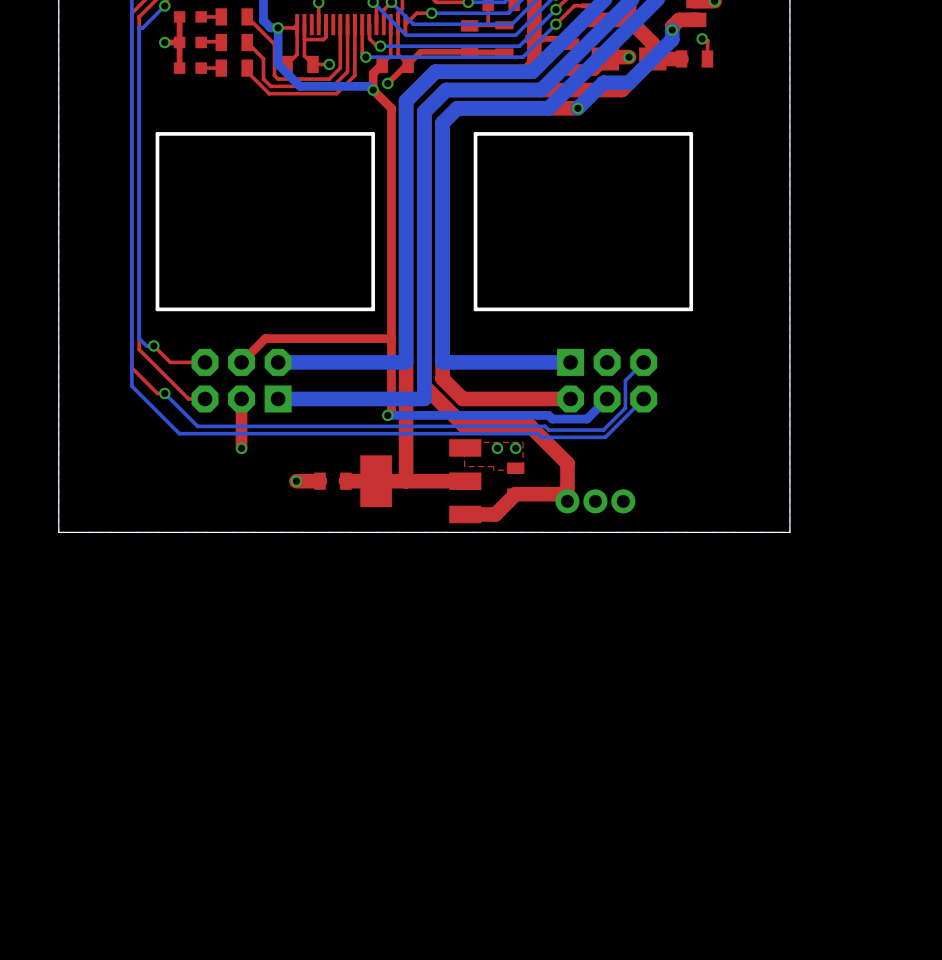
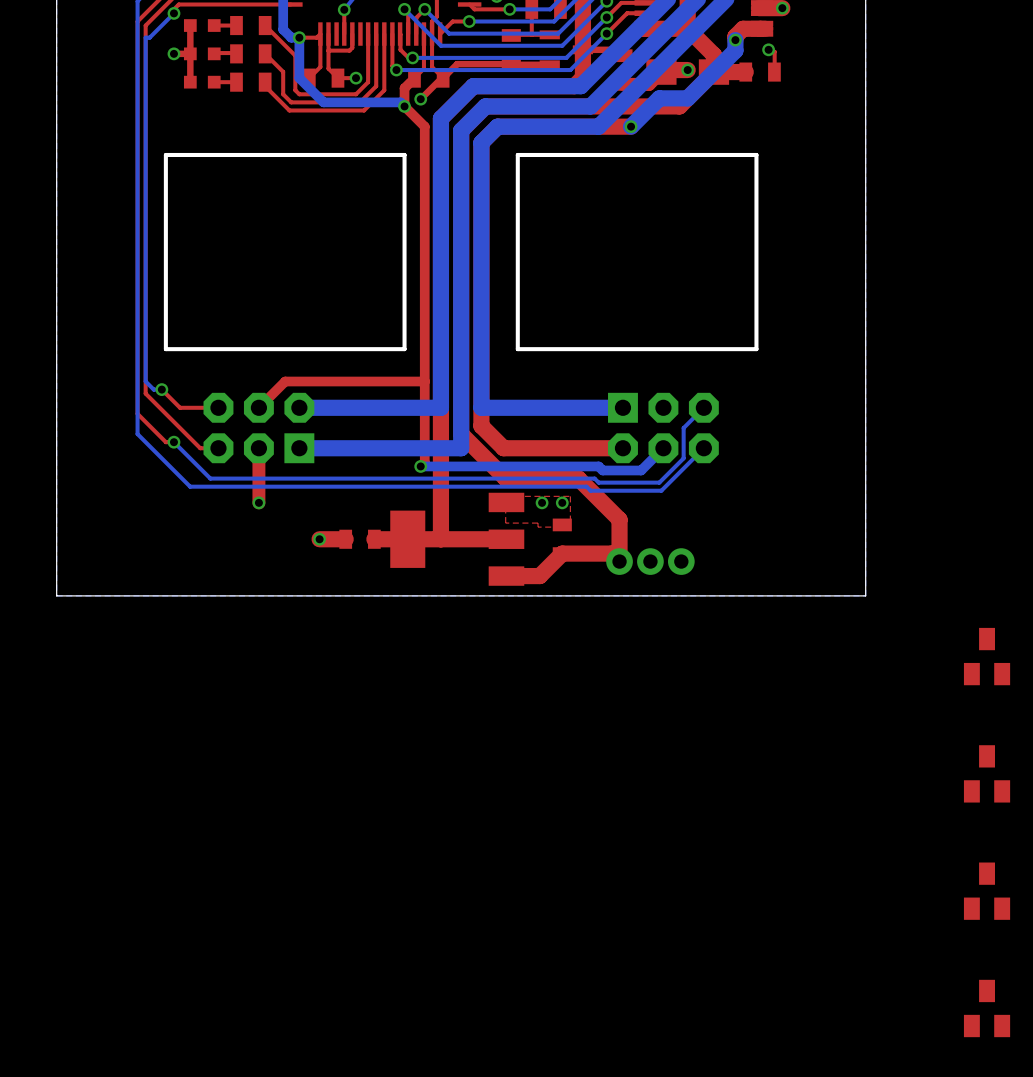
part: none -> (987, 656)
part: none -> (987, 773)
part: none -> (987, 891)
part: none -> (987, 1008)

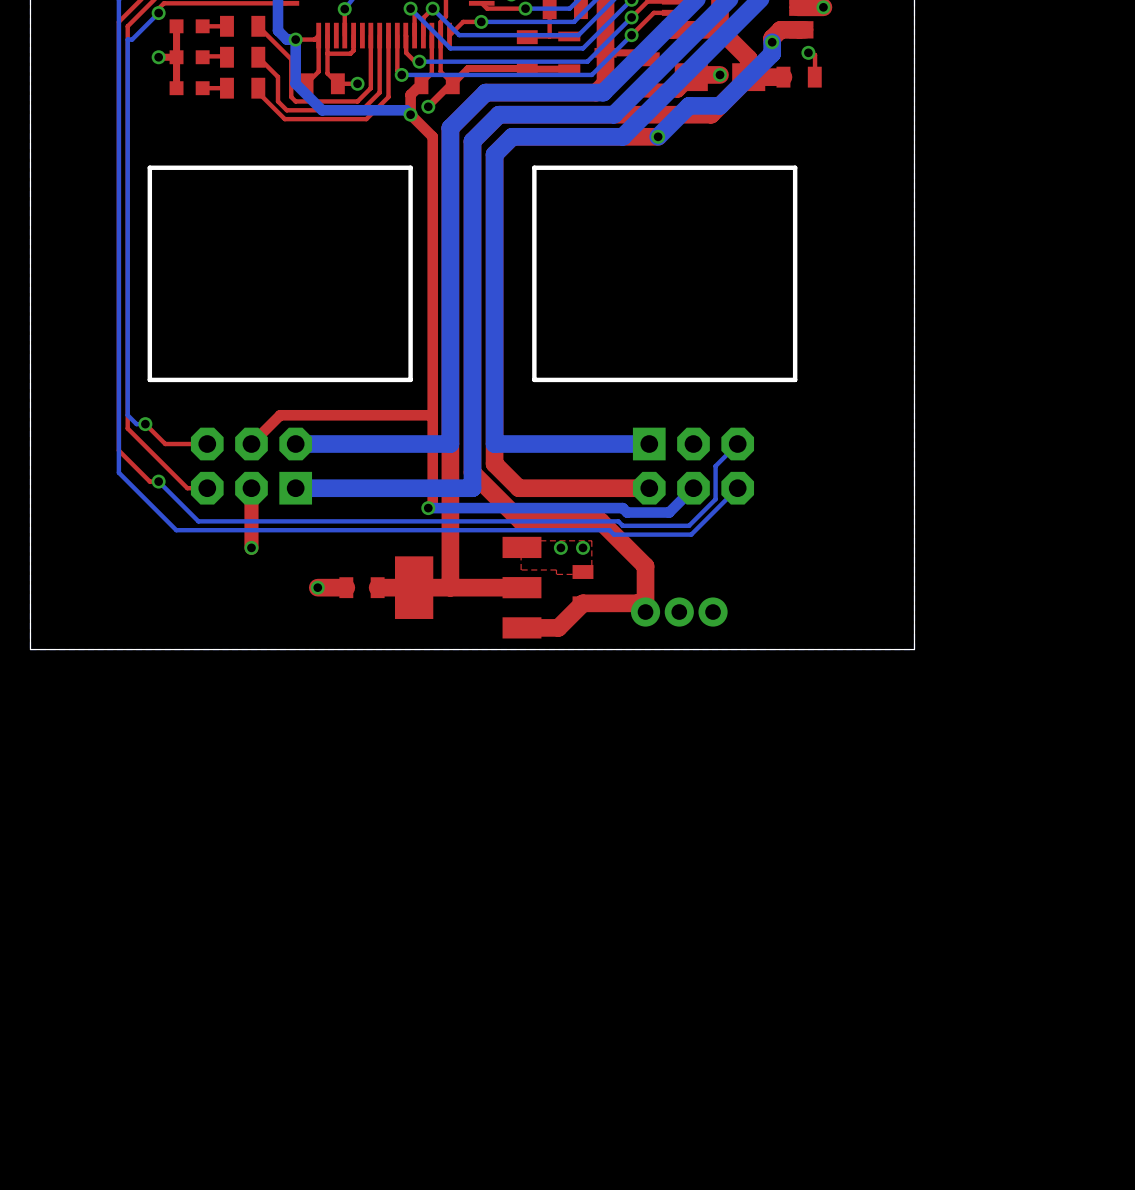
part: (987, 656) -> none
part: (987, 773) -> none
part: (987, 891) -> none
part: (987, 1008) -> none

